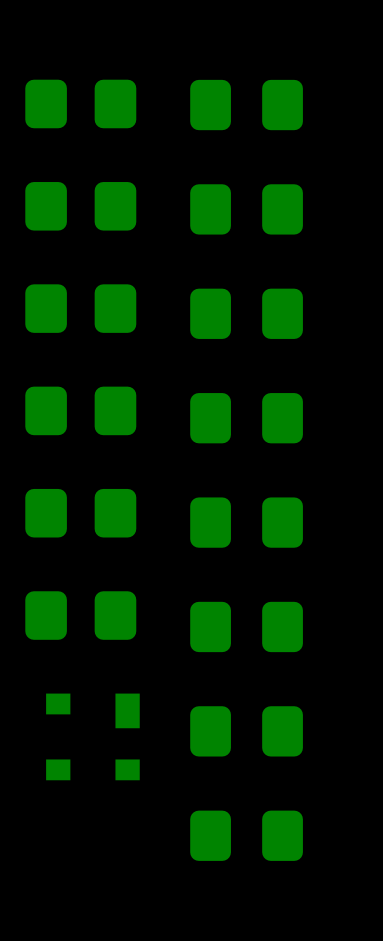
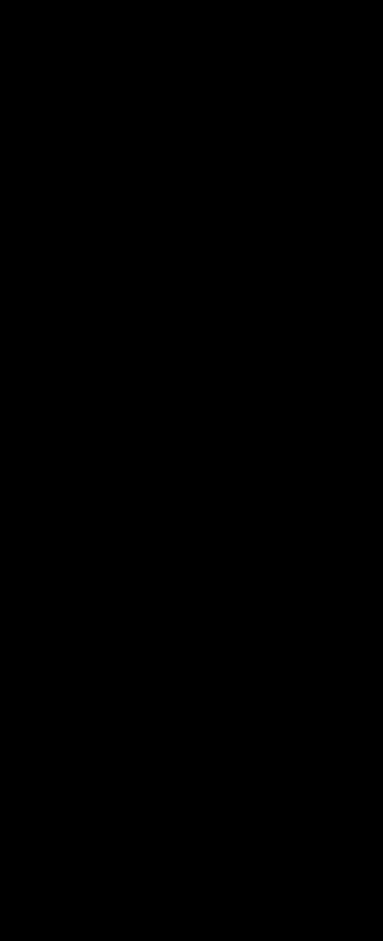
part: (80, 103) -> none
part: (246, 105) -> none
part: (80, 206) -> none
part: (246, 209) -> none
part: (80, 308) -> none
part: (246, 313) -> none
part: (80, 410) -> none
part: (246, 418) -> none
part: (80, 513) -> none
part: (246, 522) -> none
part: (80, 615) -> none
part: (246, 626) -> none
part: (246, 731) -> none
part: (92, 736) -> none
part: (246, 835) -> none

